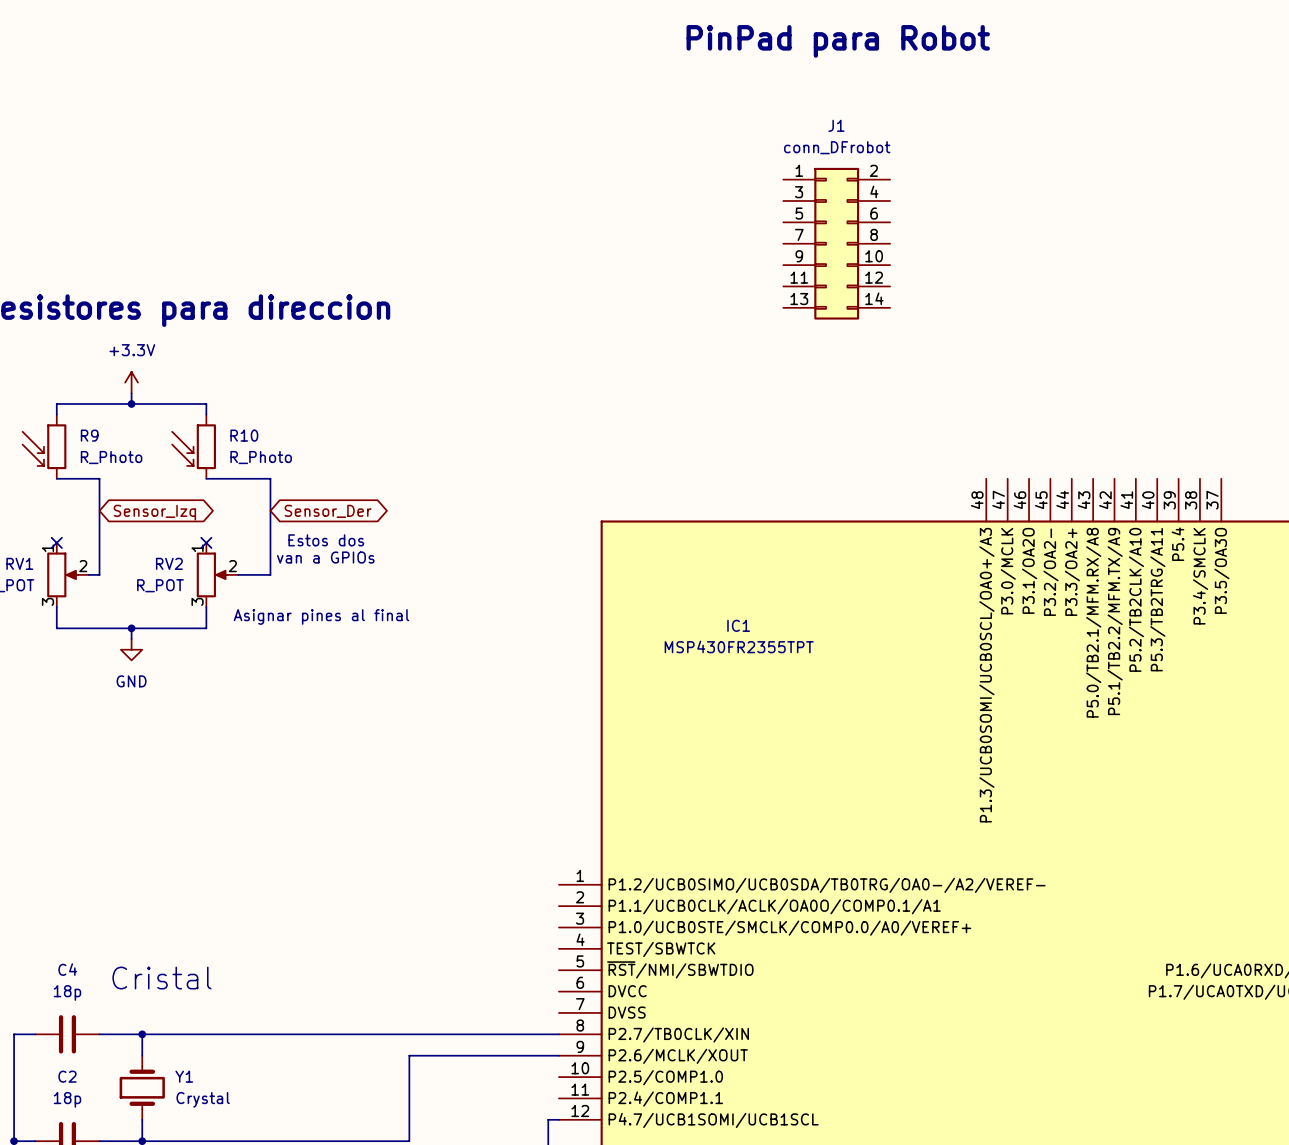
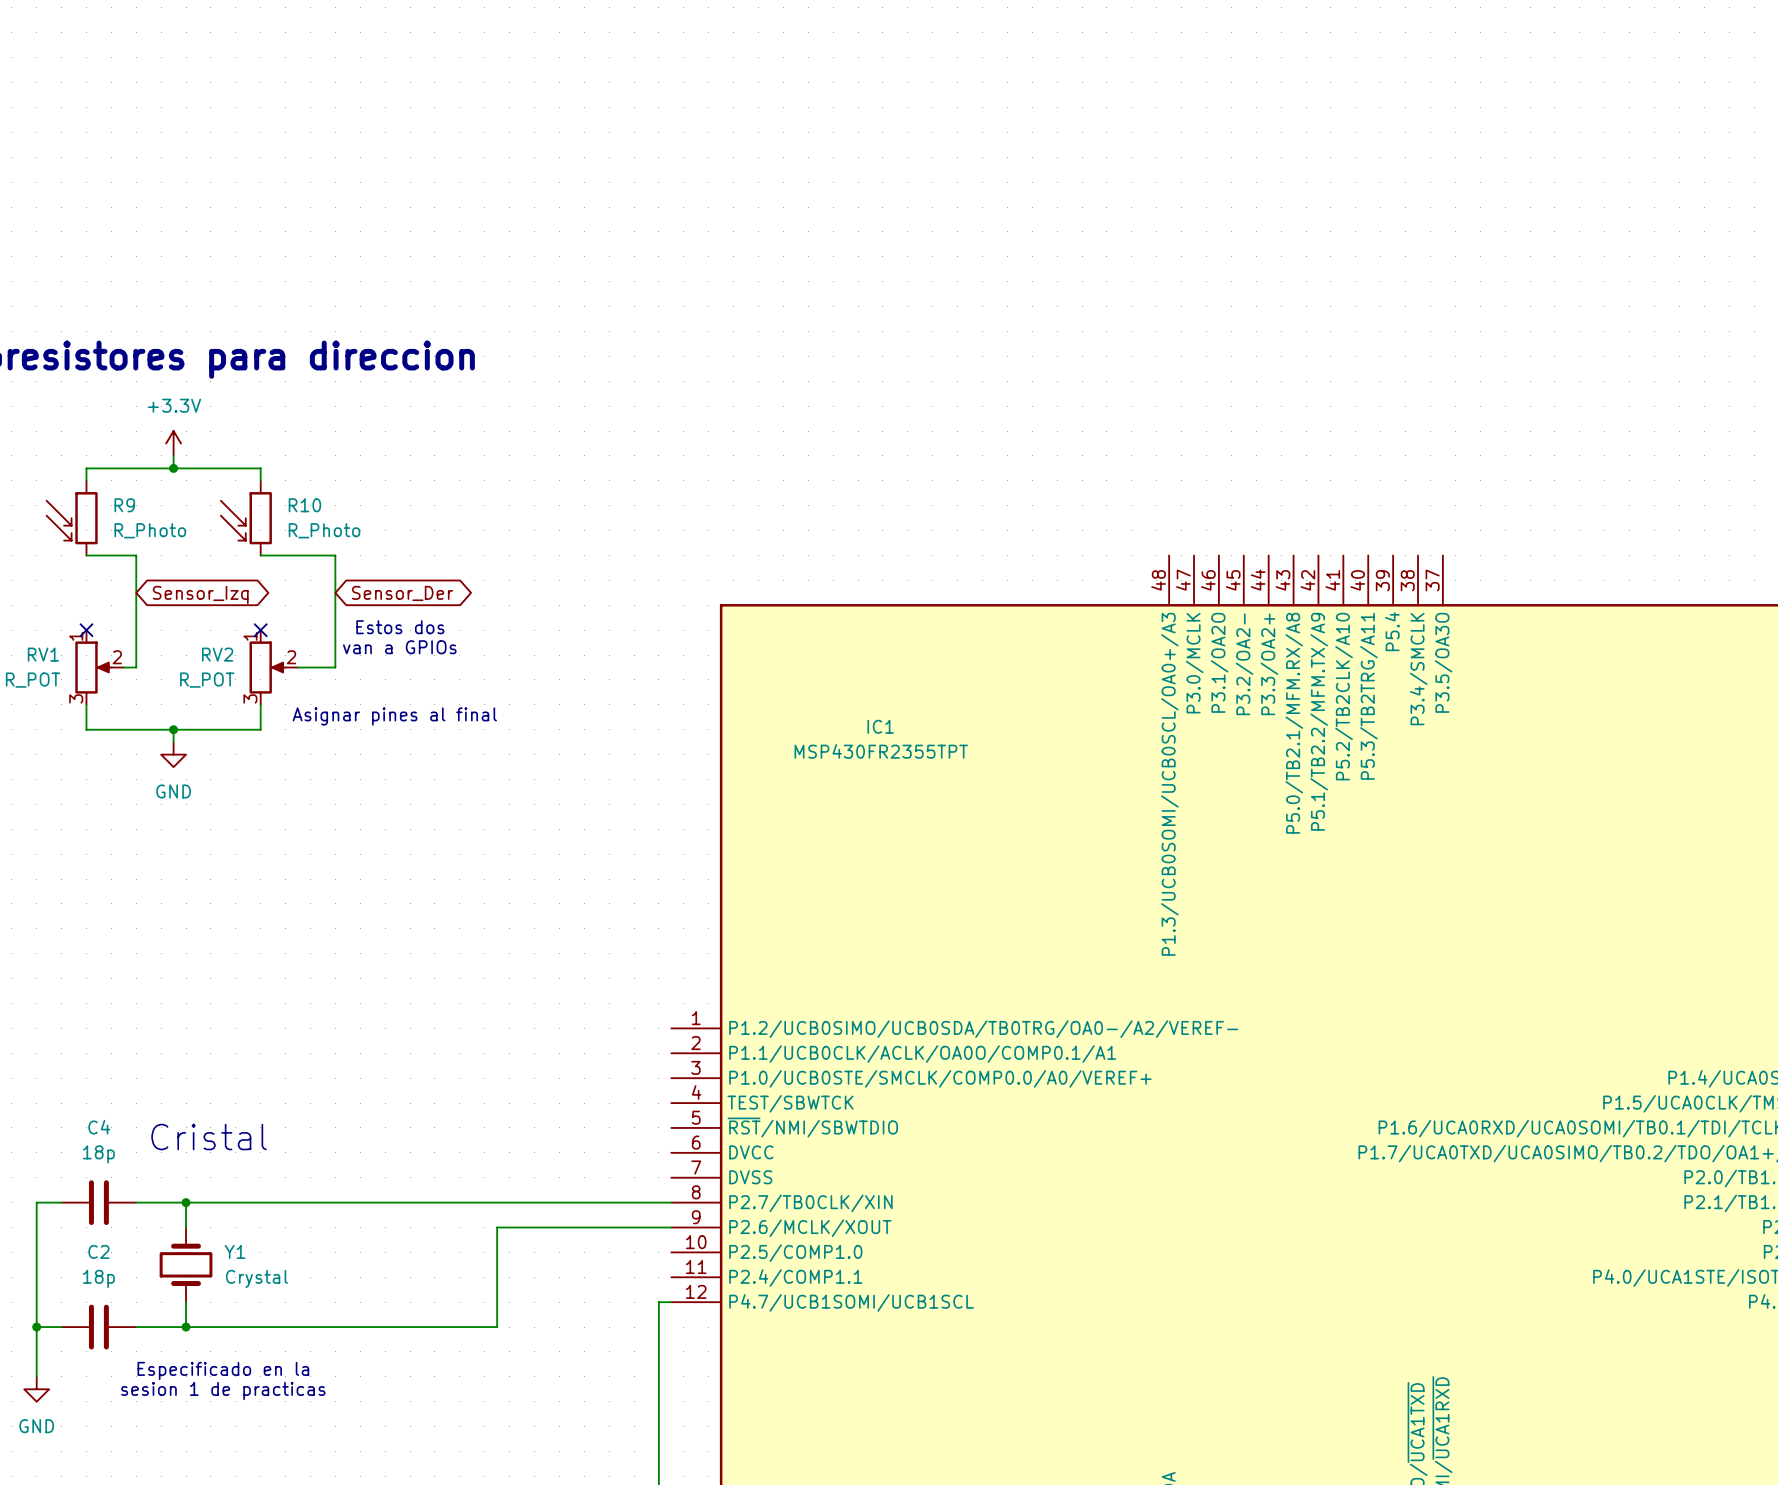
text: PinPad para Robot (838, 41) -> none
J1: conn_DFrobot (836, 243) -> none

